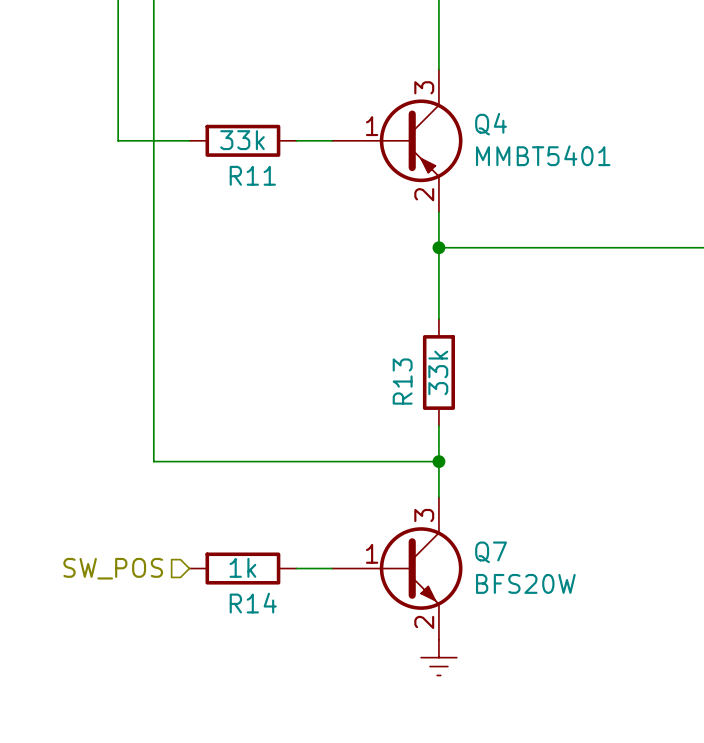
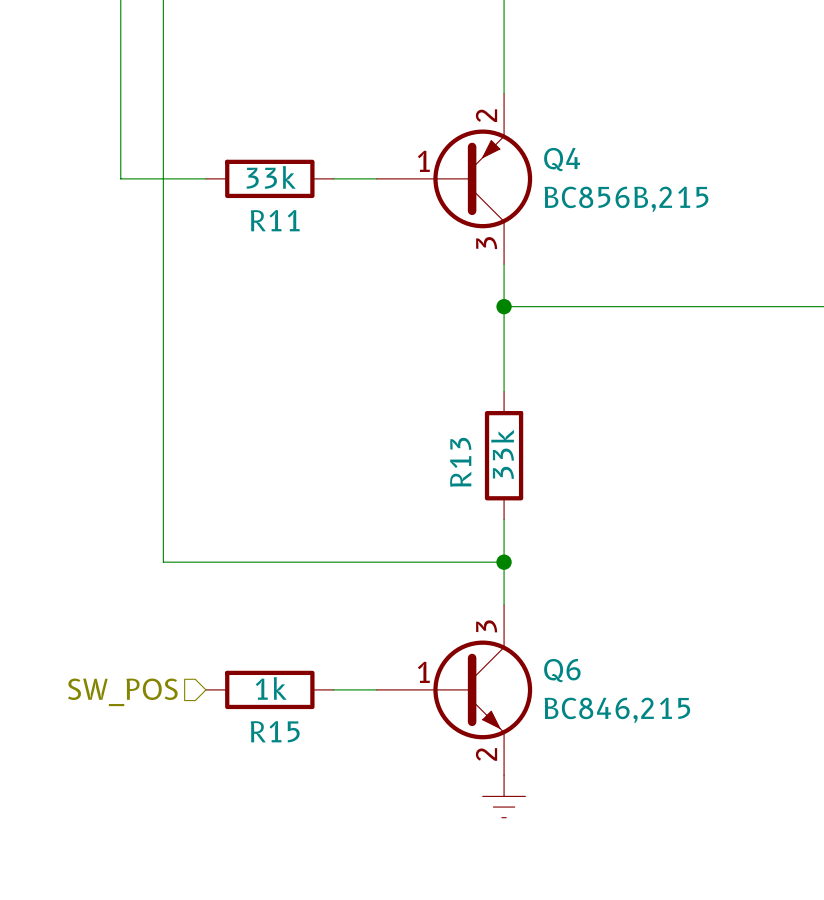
Q4 flip: as is (421, 140) -> up-down (482, 178)
Q4 value: MMBT5401 (543, 155) -> BC856B,215 (626, 199)
Q7 name: Q7 (491, 552) -> Q6 (562, 670)
Q7 value: BFS20W (525, 583) -> BC846,215 (617, 710)
R14 name: R14 (253, 603) -> R15 (275, 731)

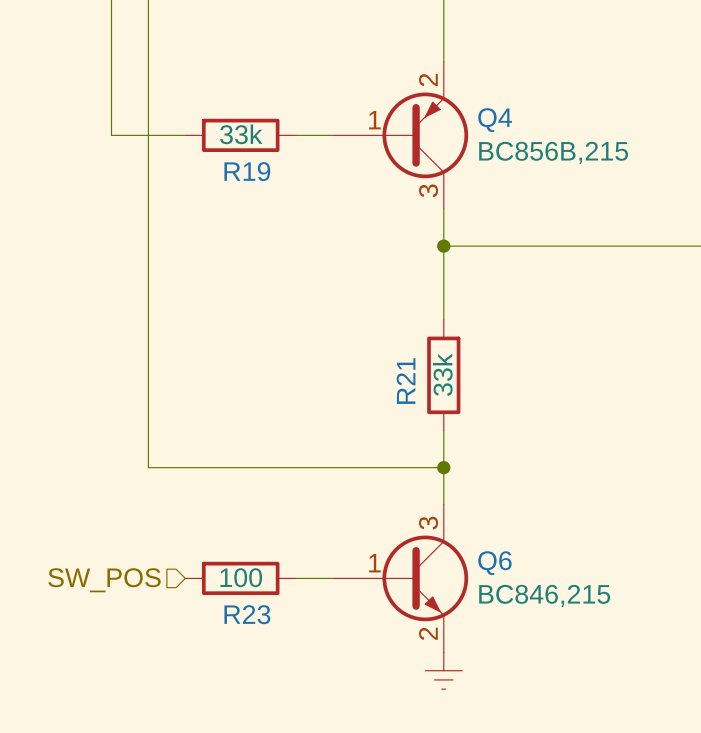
R11 name: R11 (275, 220) -> R19 (247, 171)
R13 name: R13 (460, 462) -> R21 (406, 381)
R15 value: 1k (271, 688) -> 100 (241, 577)
R15 name: R15 (275, 731) -> R23 (247, 614)

